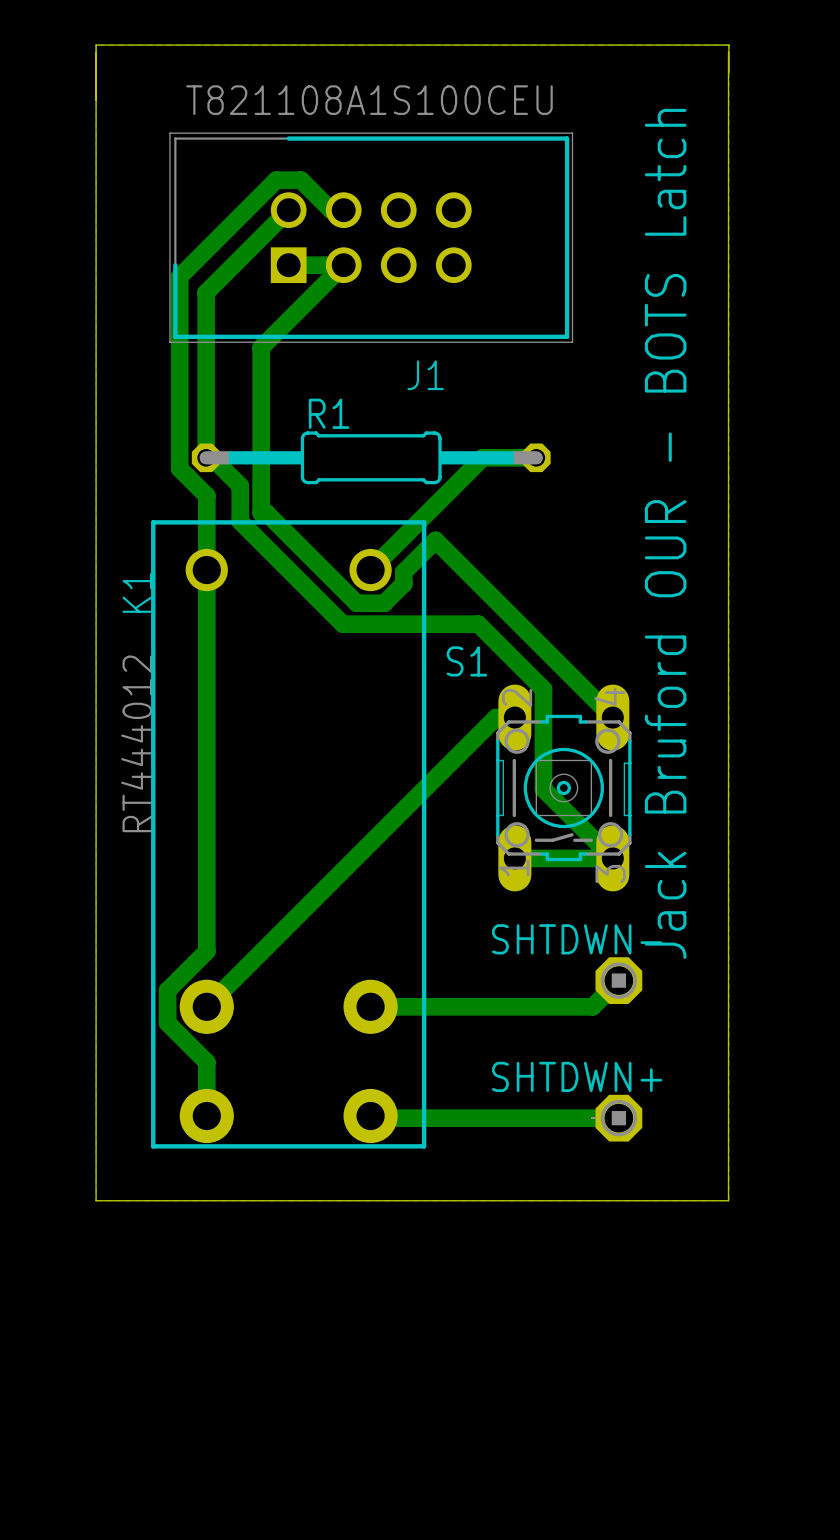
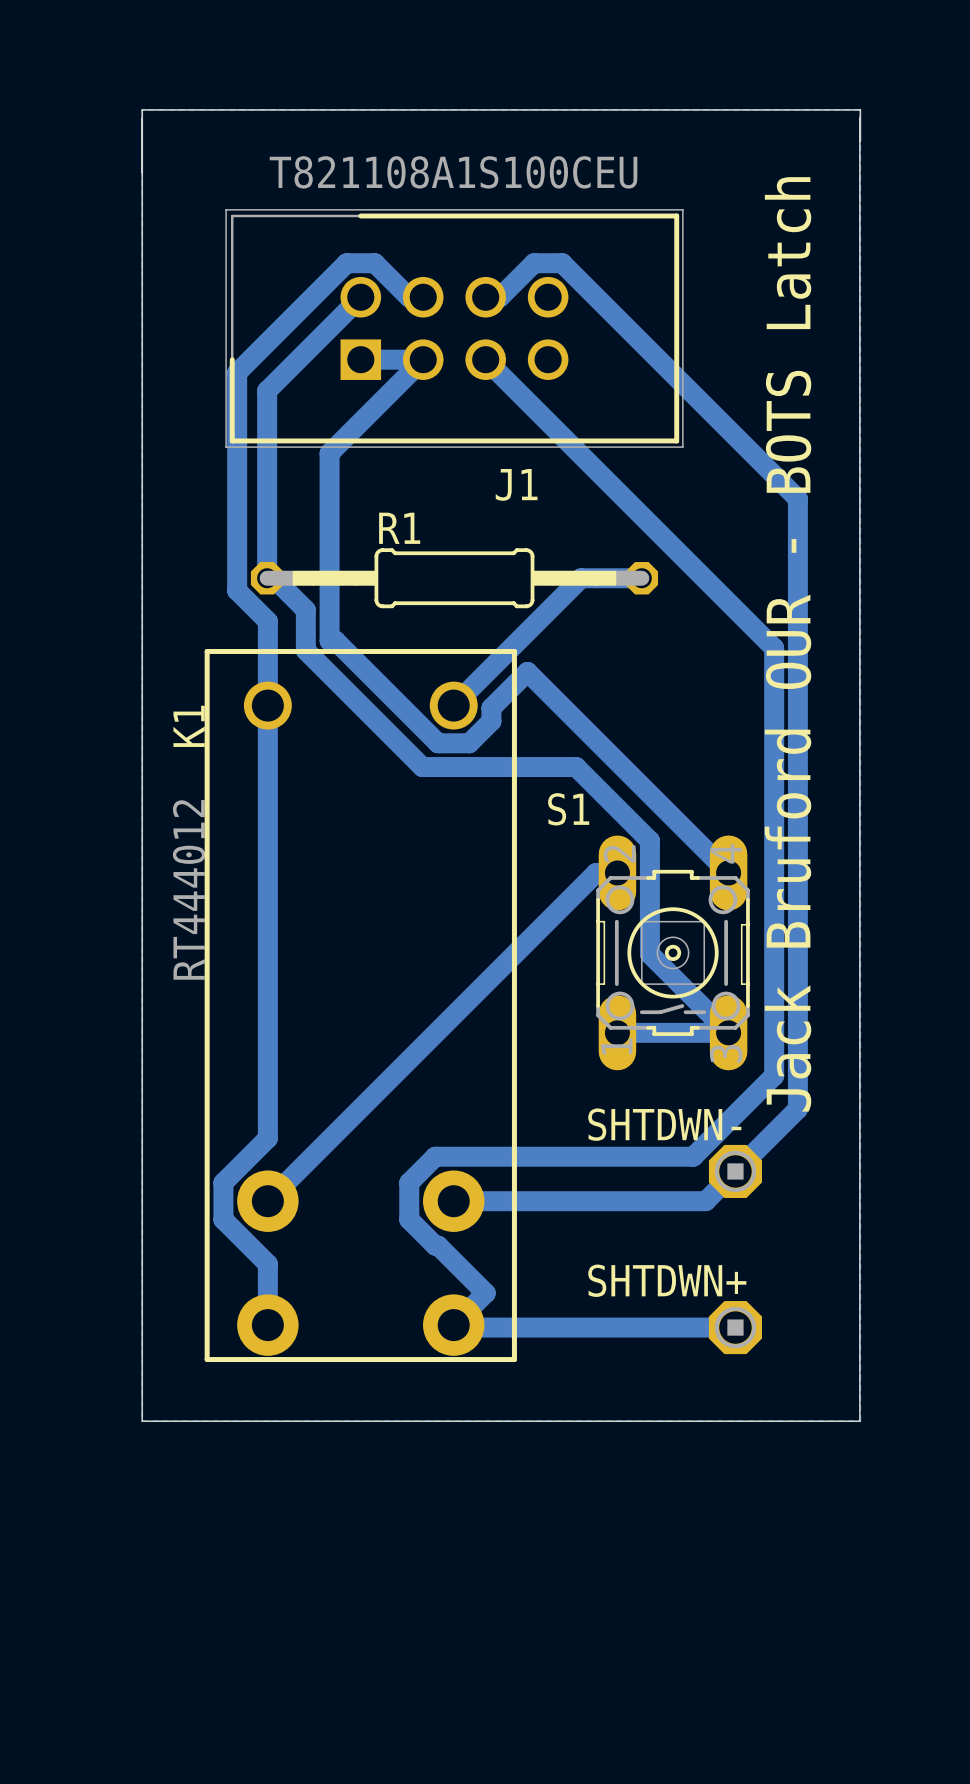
bottom track: none -> (485, 297) (500, 297) (534, 263) (562, 263) (797, 498) (797, 1109) (735, 1171)
bottom track: none -> (485, 359) (774, 648) (774, 1075) (693, 1156) (435, 1156) (409, 1182) (409, 1219) (485, 1293) (453, 1325)

